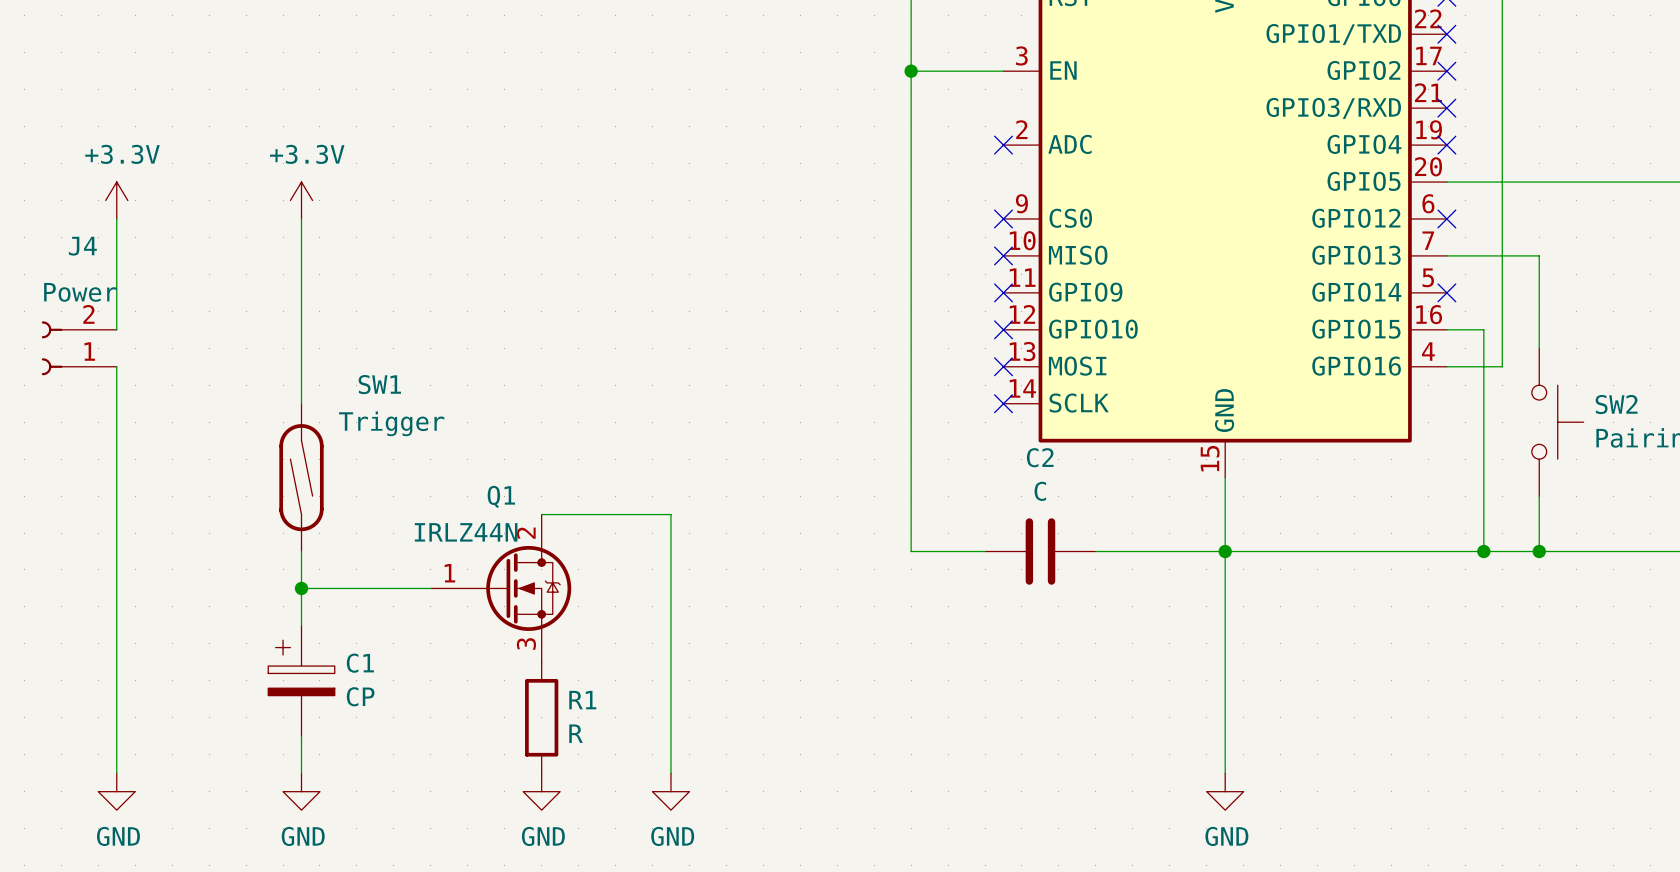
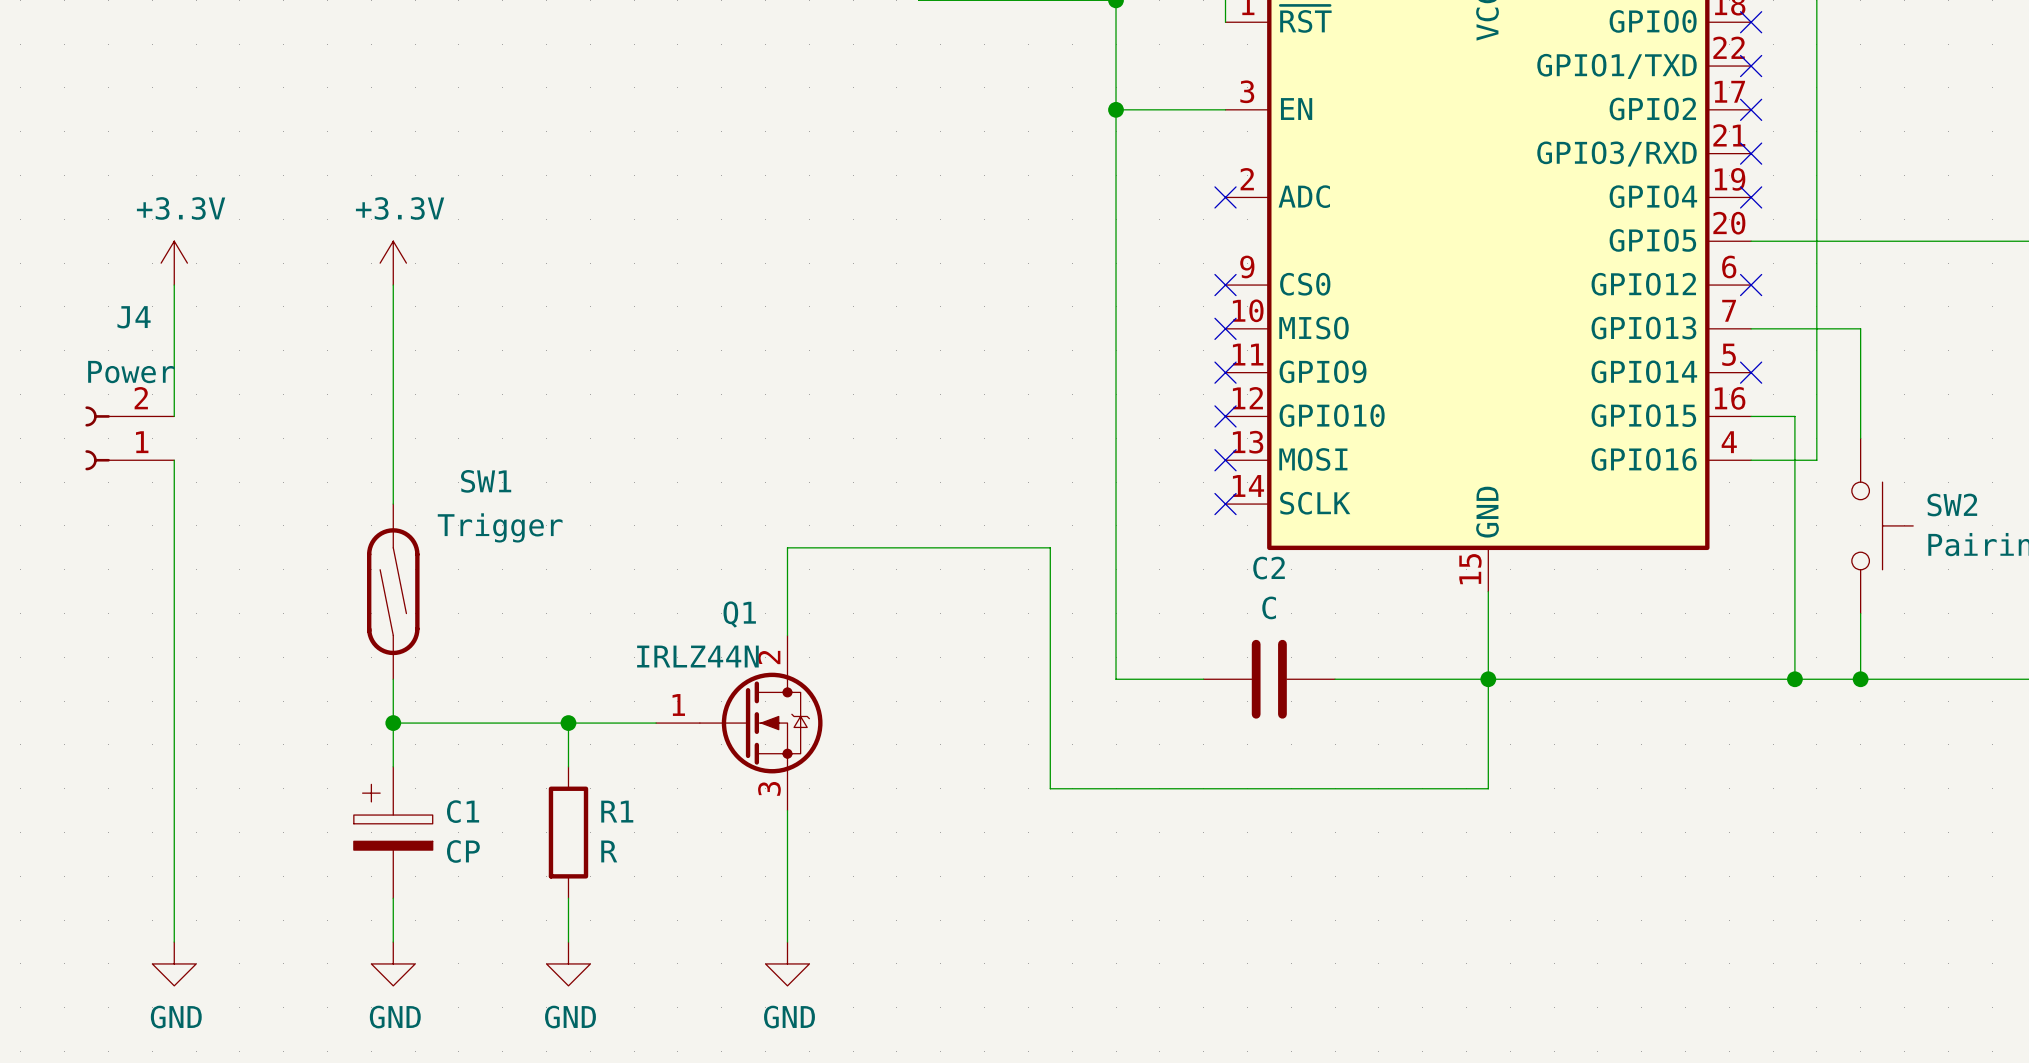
wire: (541, 514) (670, 514) (670, 773) -> none
wire: none -> (568, 723) (568, 766)
junction: none -> (568, 723)
Q1 position: (501, 588) -> (739, 723)
wire: (1225, 643) (1225, 773) -> (1488, 788) (1050, 788) (1050, 547) (787, 547) (787, 635)
wire: none -> (787, 810) (787, 942)
R1 position: (541, 717) -> (568, 832)
wire: none -> (568, 898) (568, 942)
power symbol: none -> GND (568, 963)
power symbol: GND (541, 791) -> none
power symbol position: GND (670, 791) -> GND (787, 963)
power symbol: GND (1225, 791) -> none

